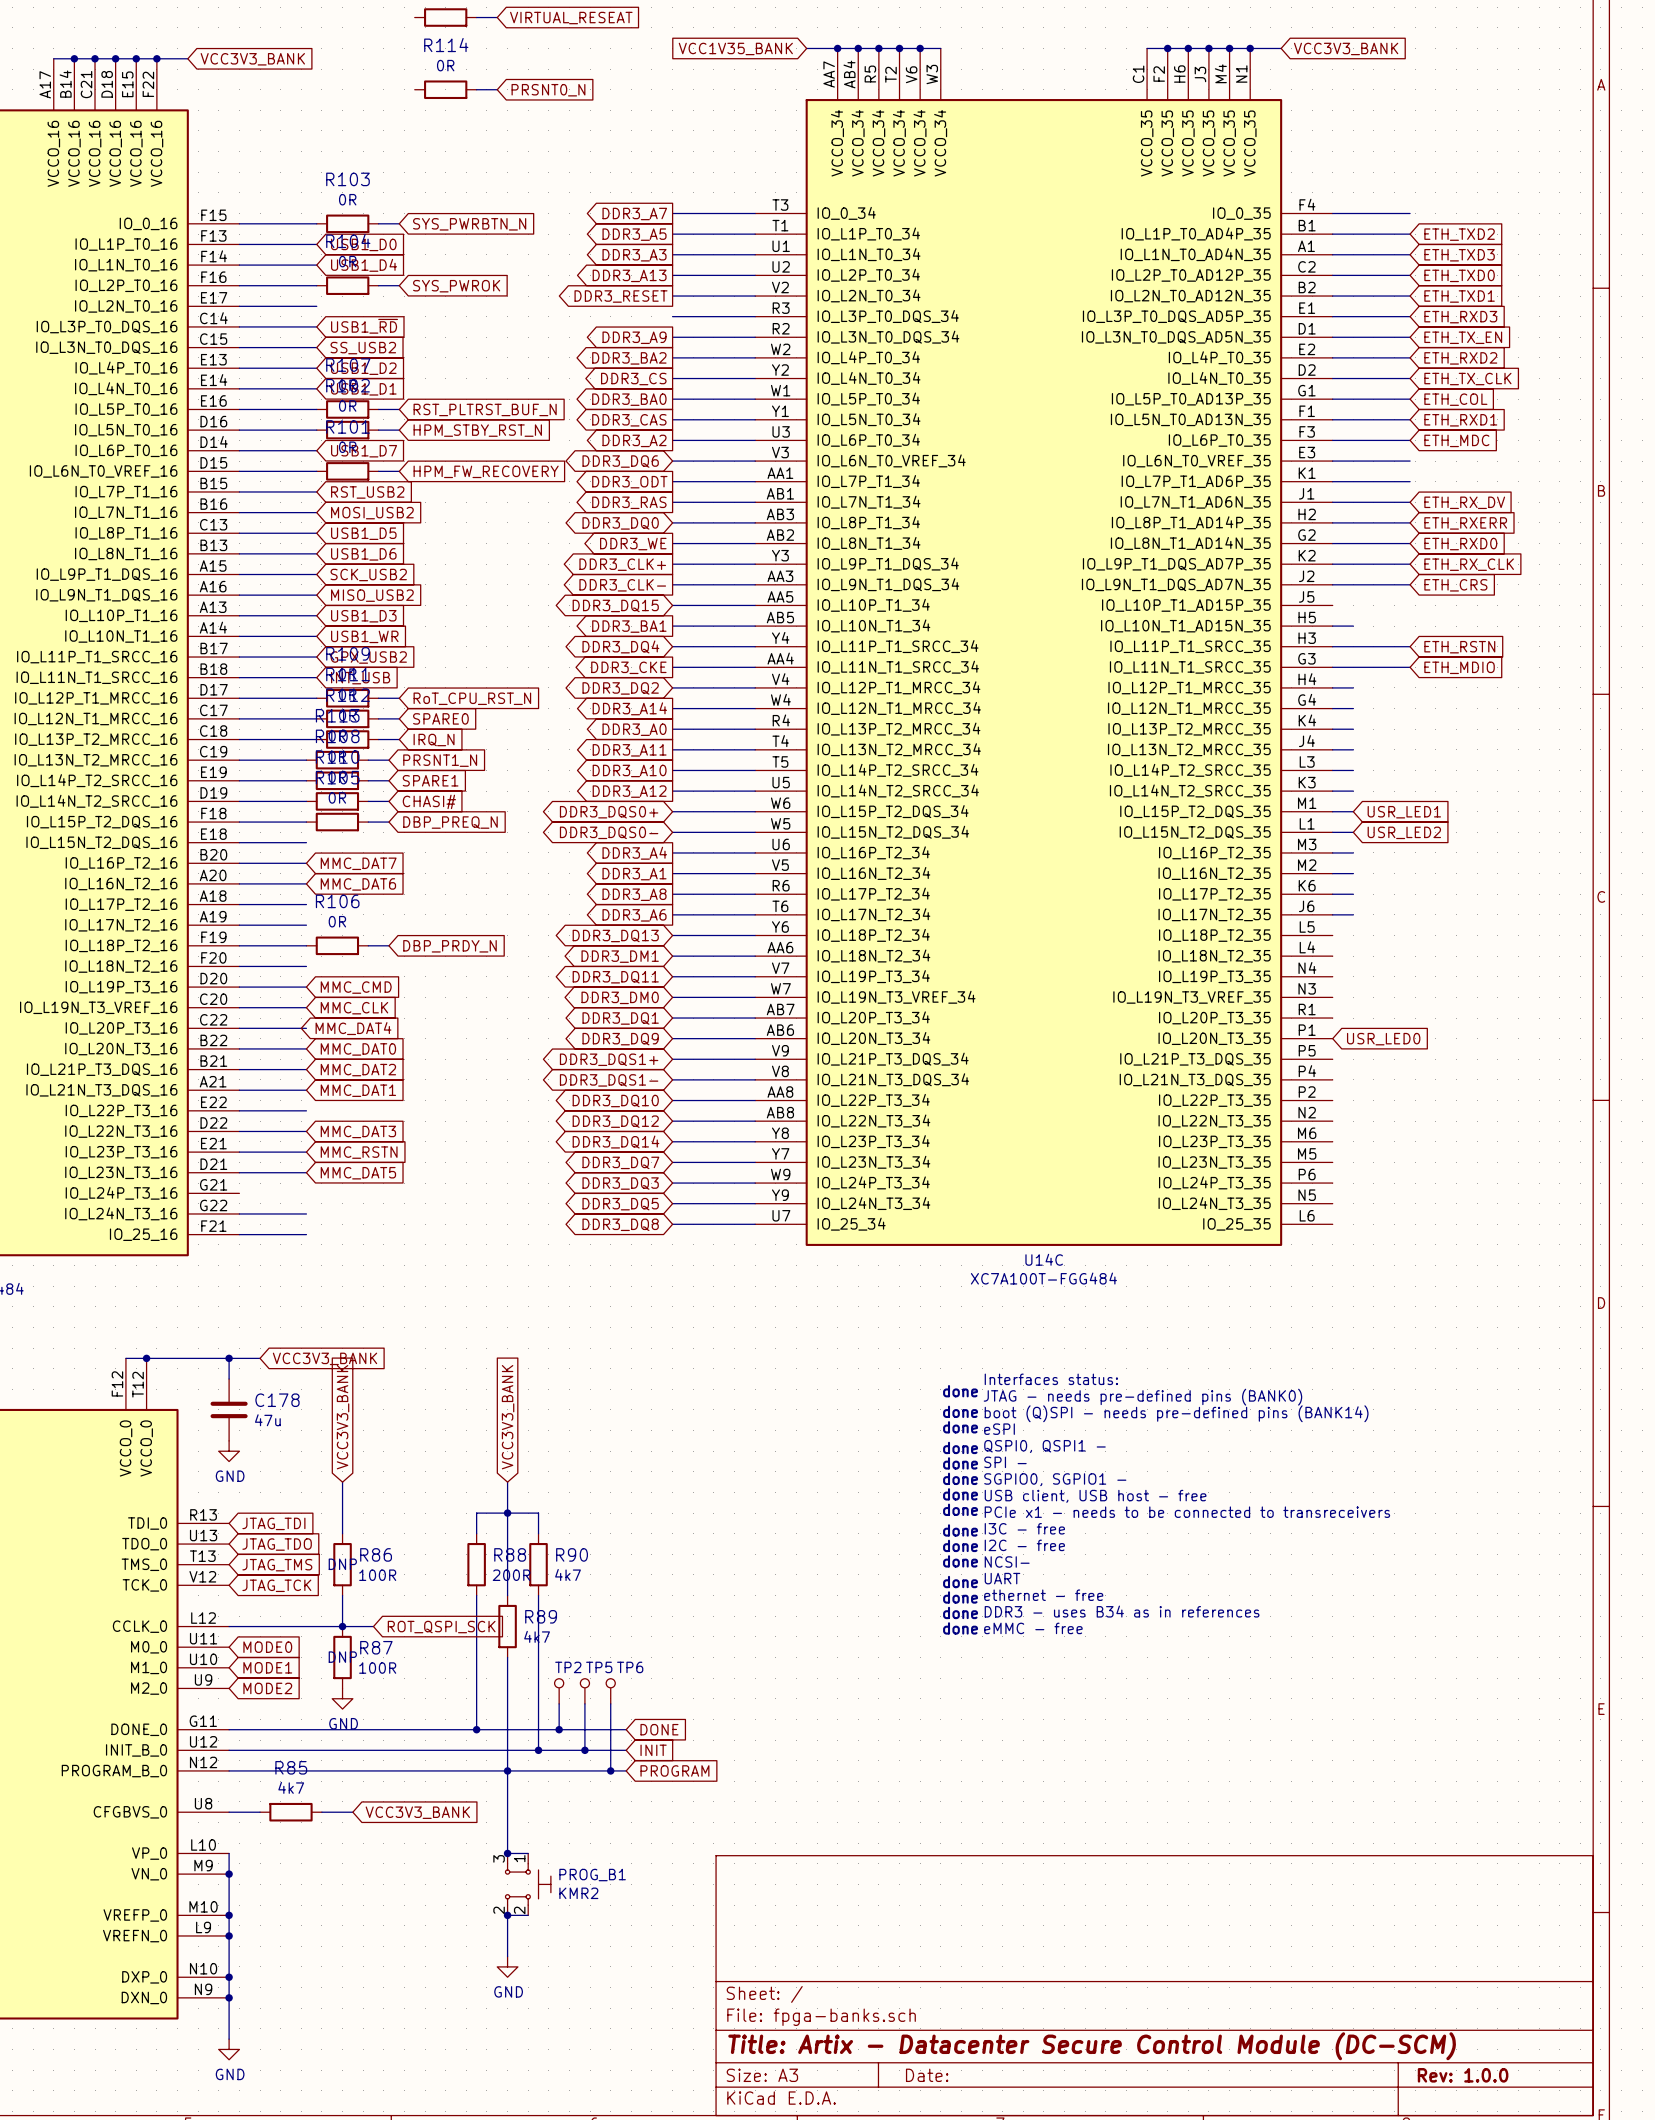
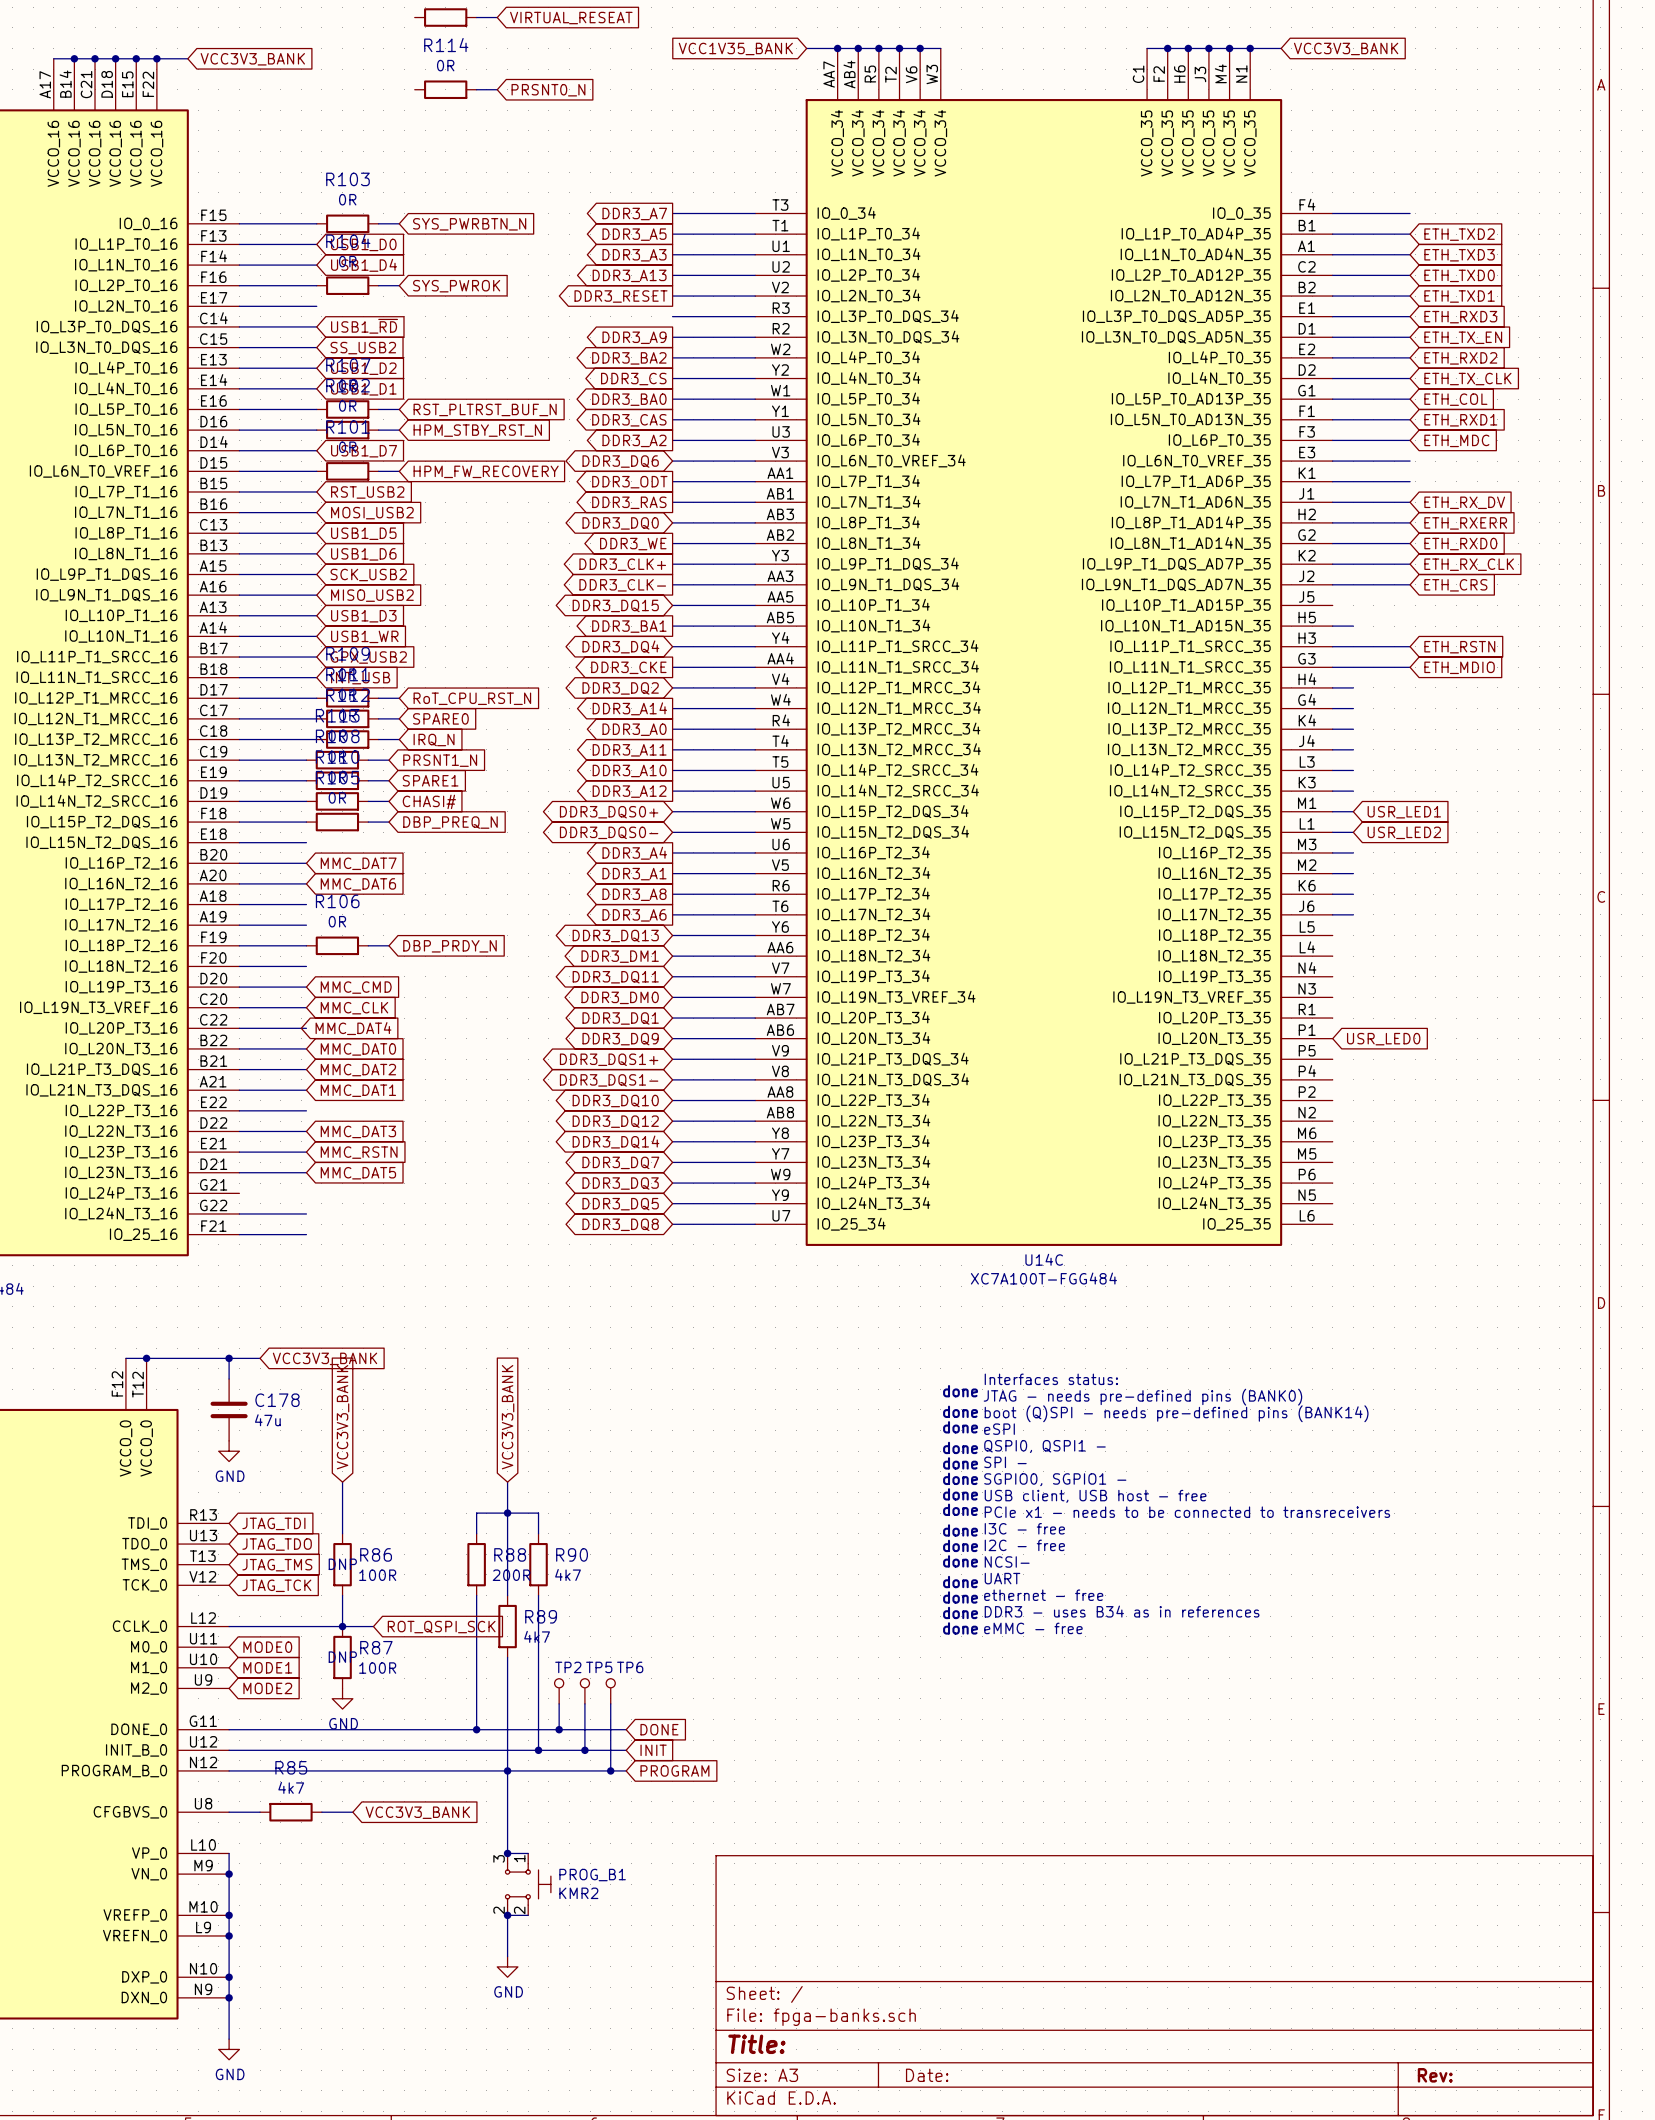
title block: Title: Artix - Datacenter Secure Control Module (DC-SCM) (1092, 2046) -> Title: (756, 2044)
title block: Rev: 1.0.0 (1463, 2075) -> Rev: (1435, 2075)

